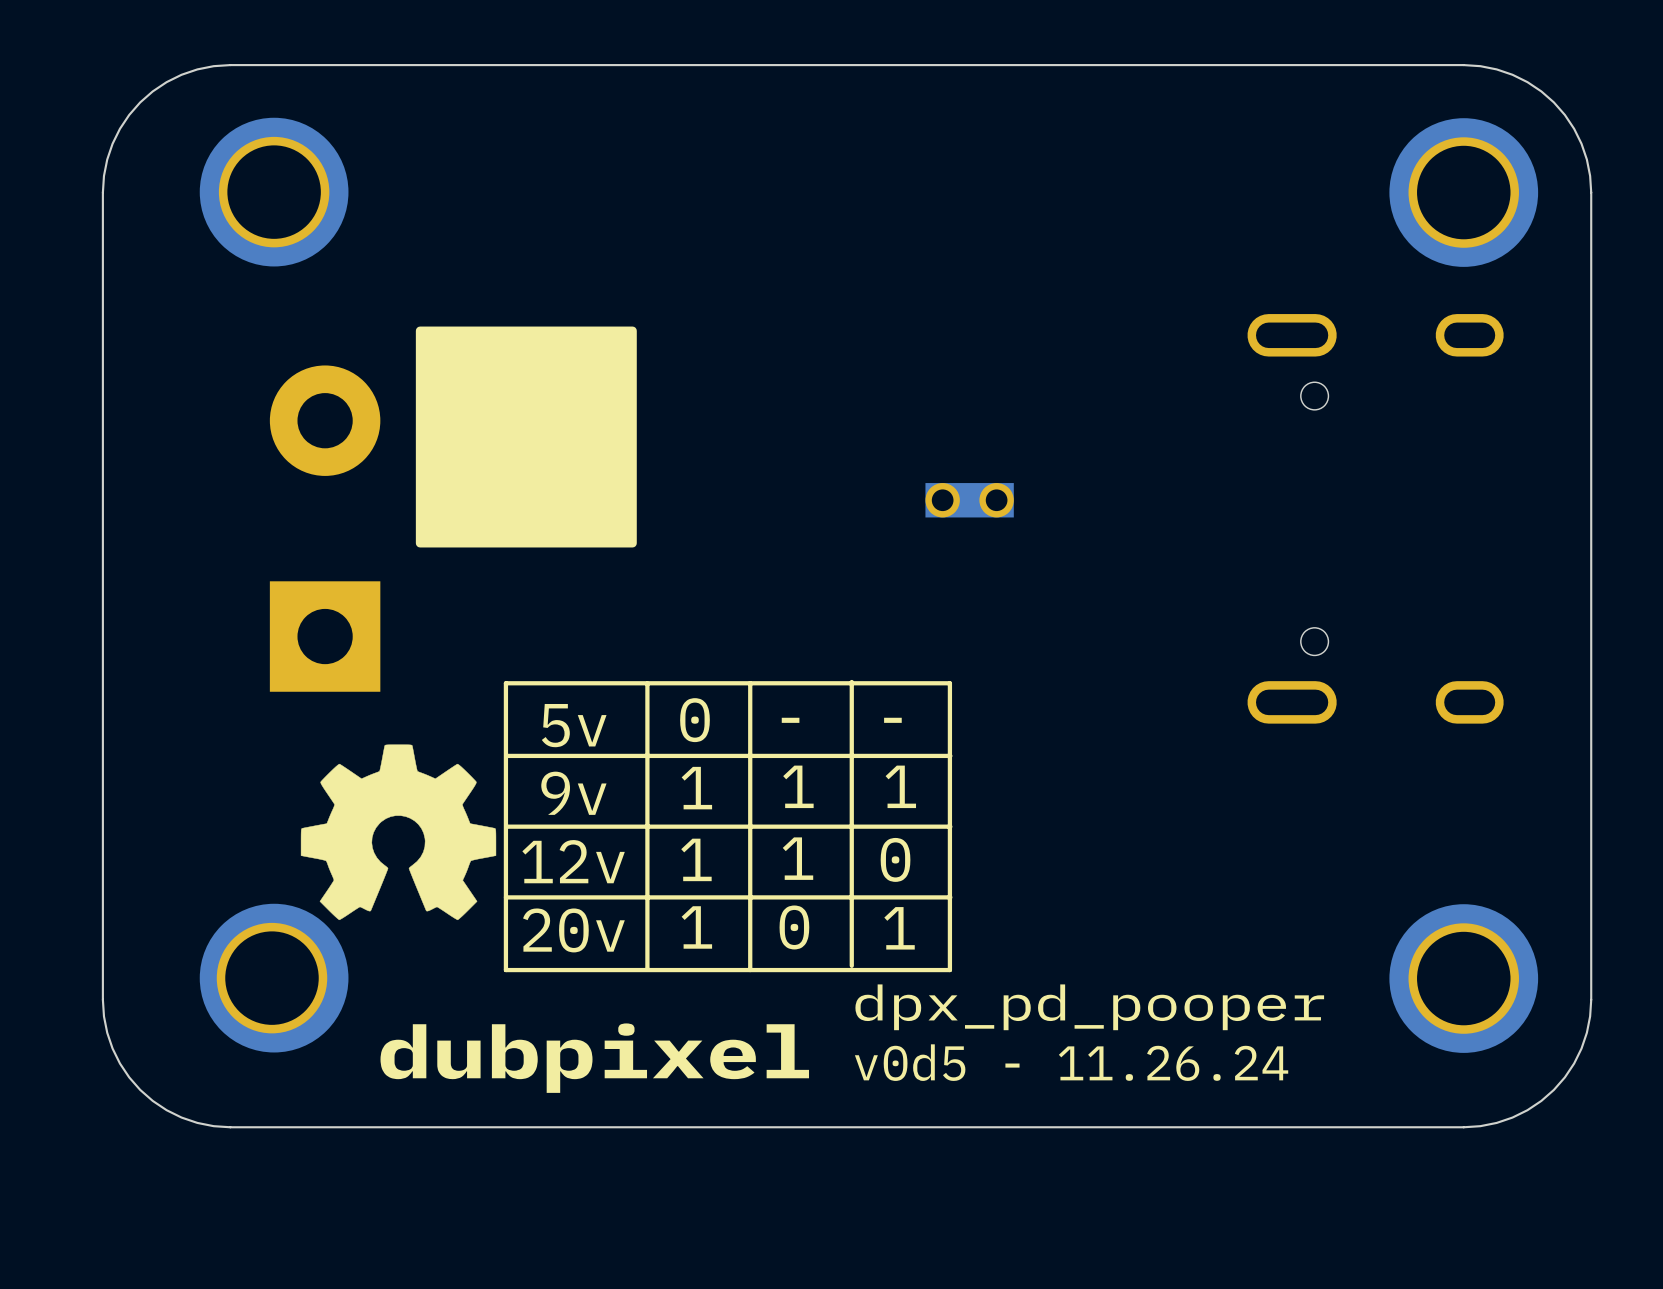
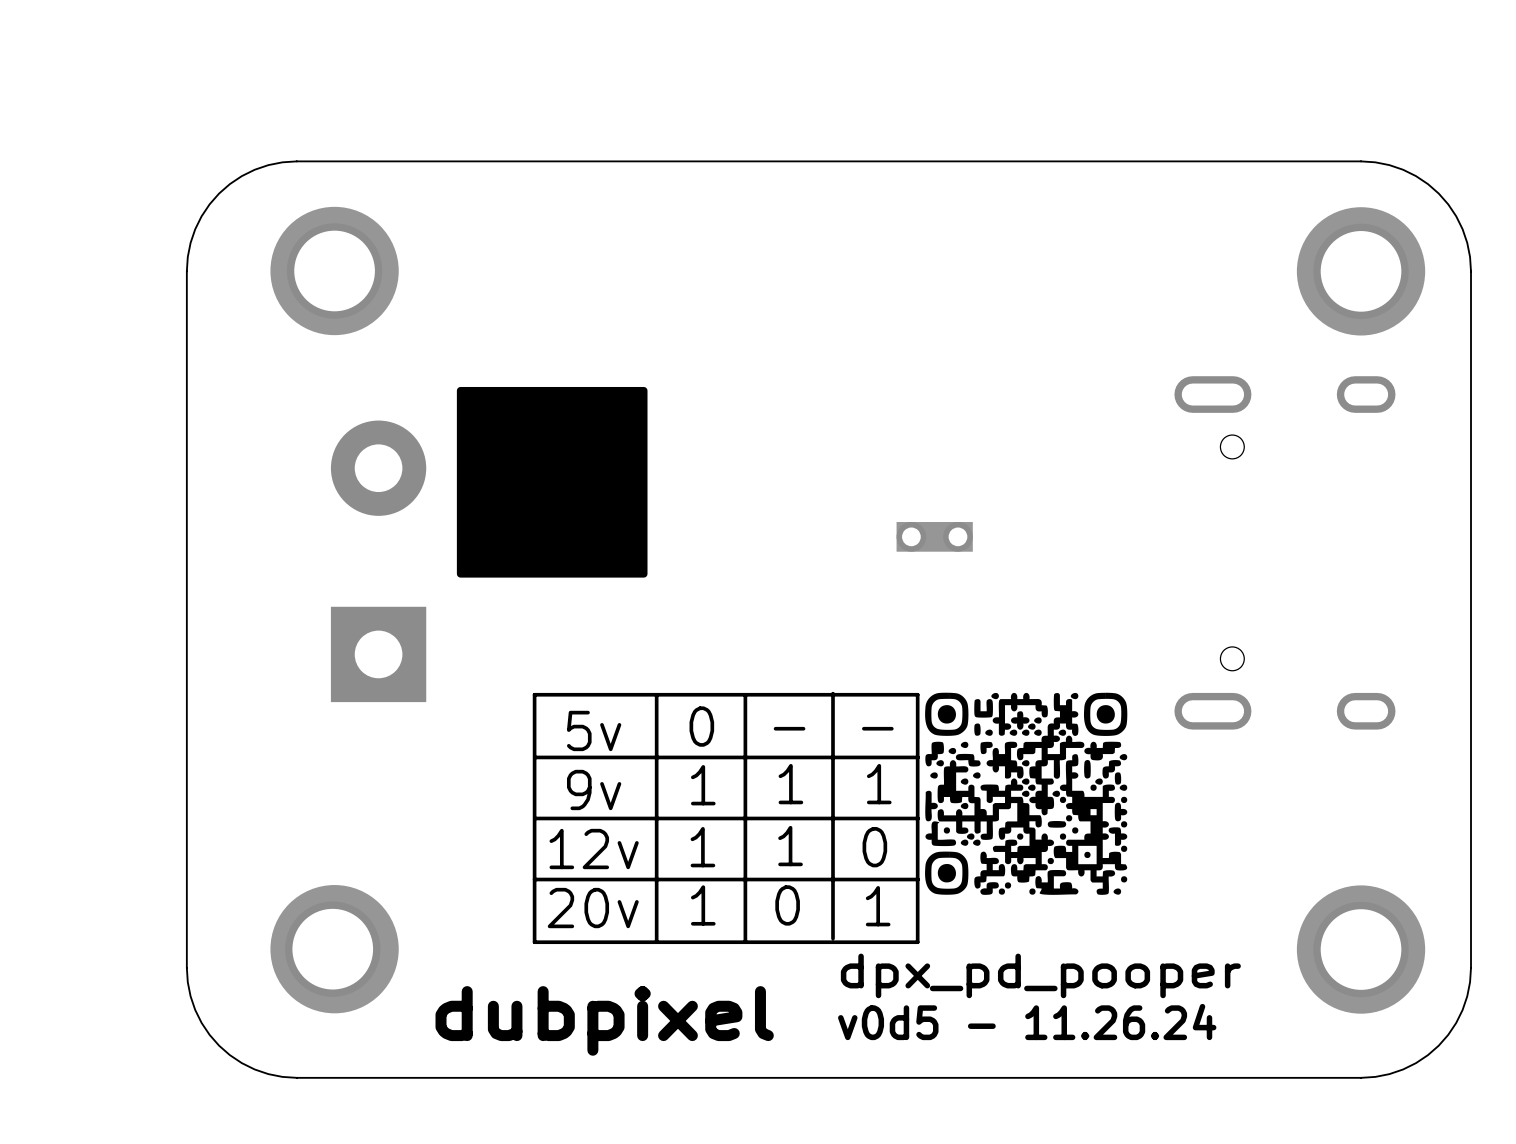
drawing: none -> [925, 692, 1128, 895]
drawing: [300, 744, 497, 921] -> none

